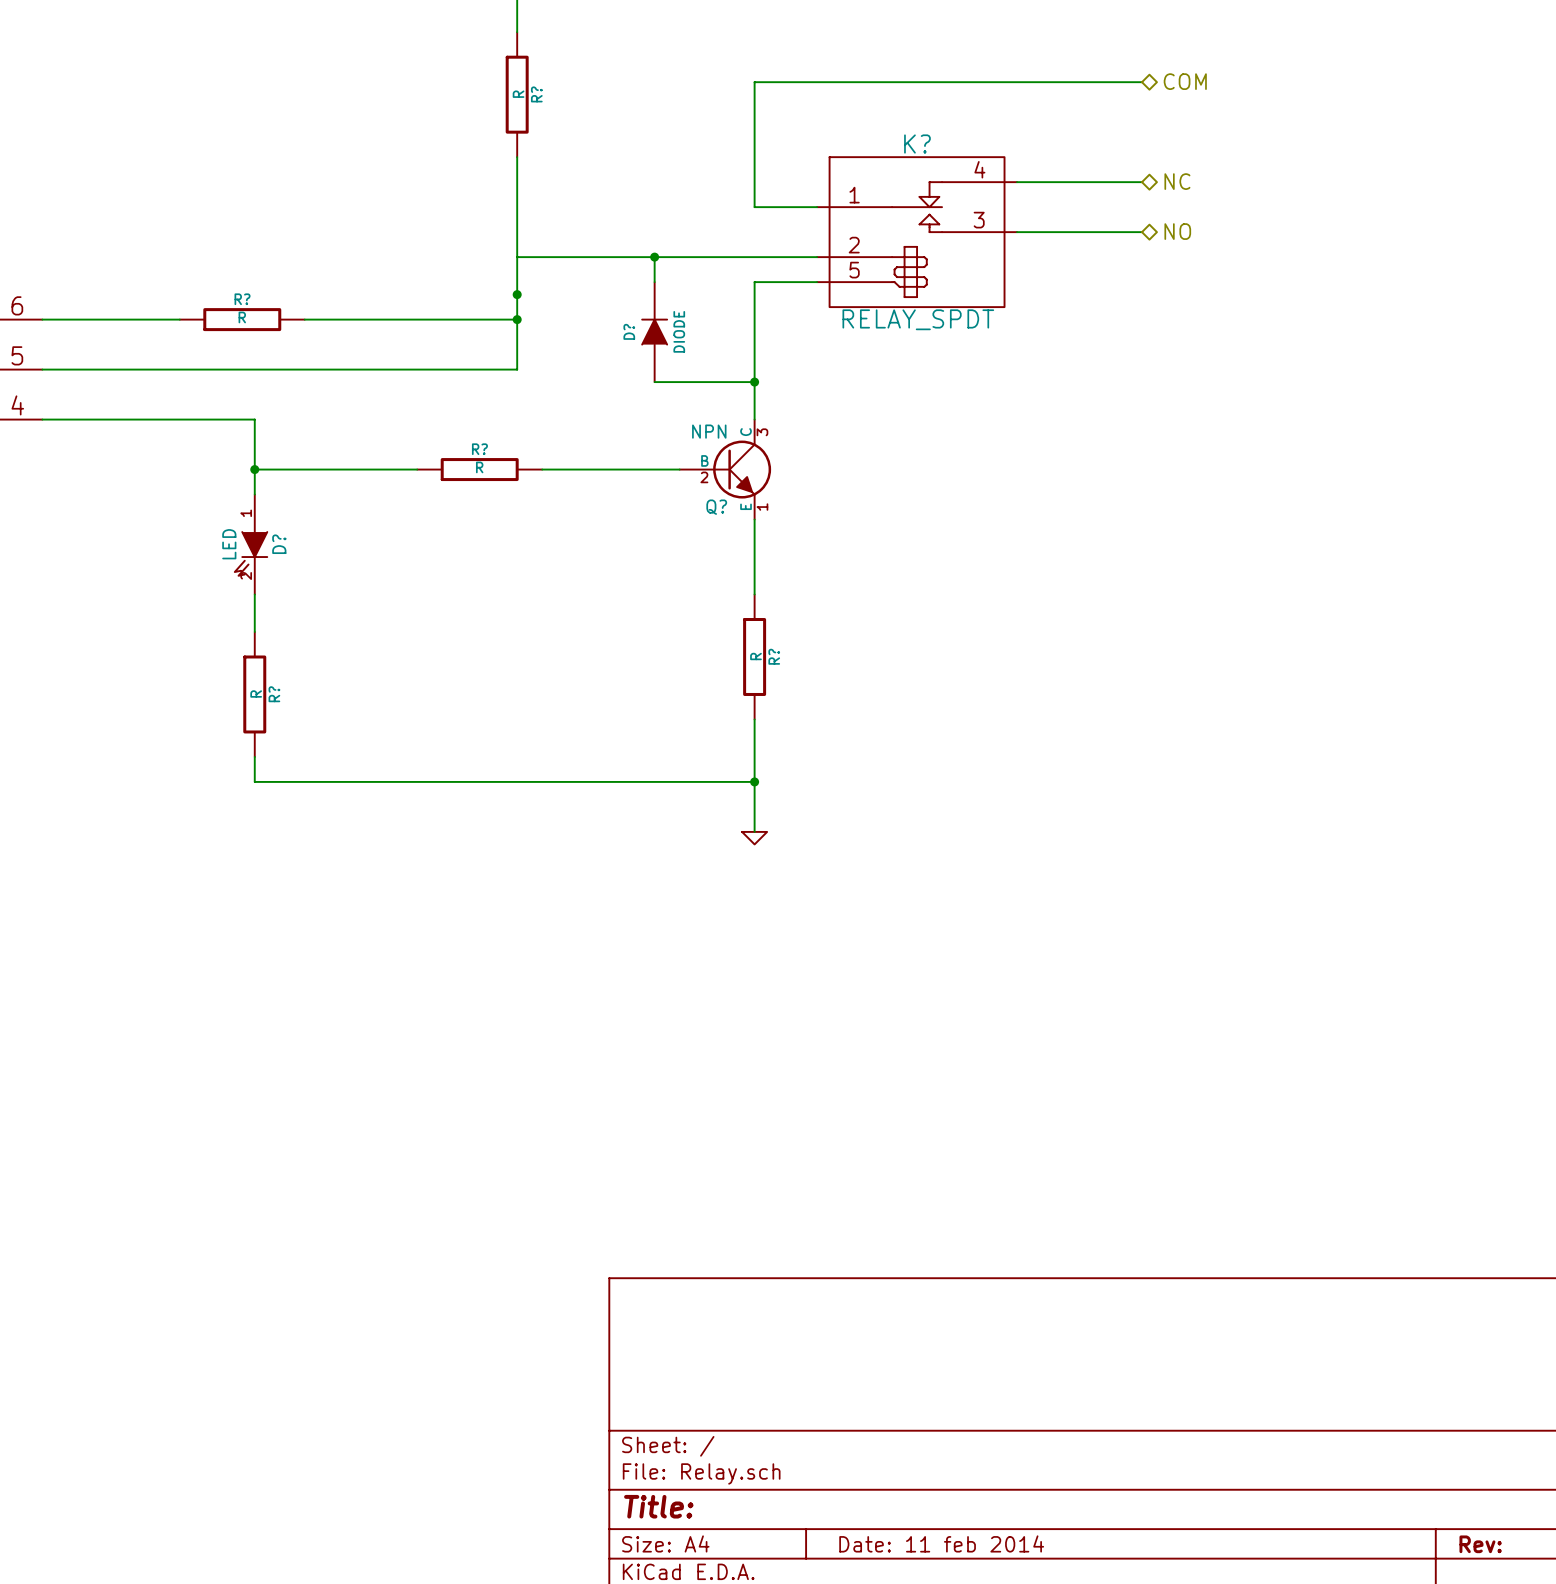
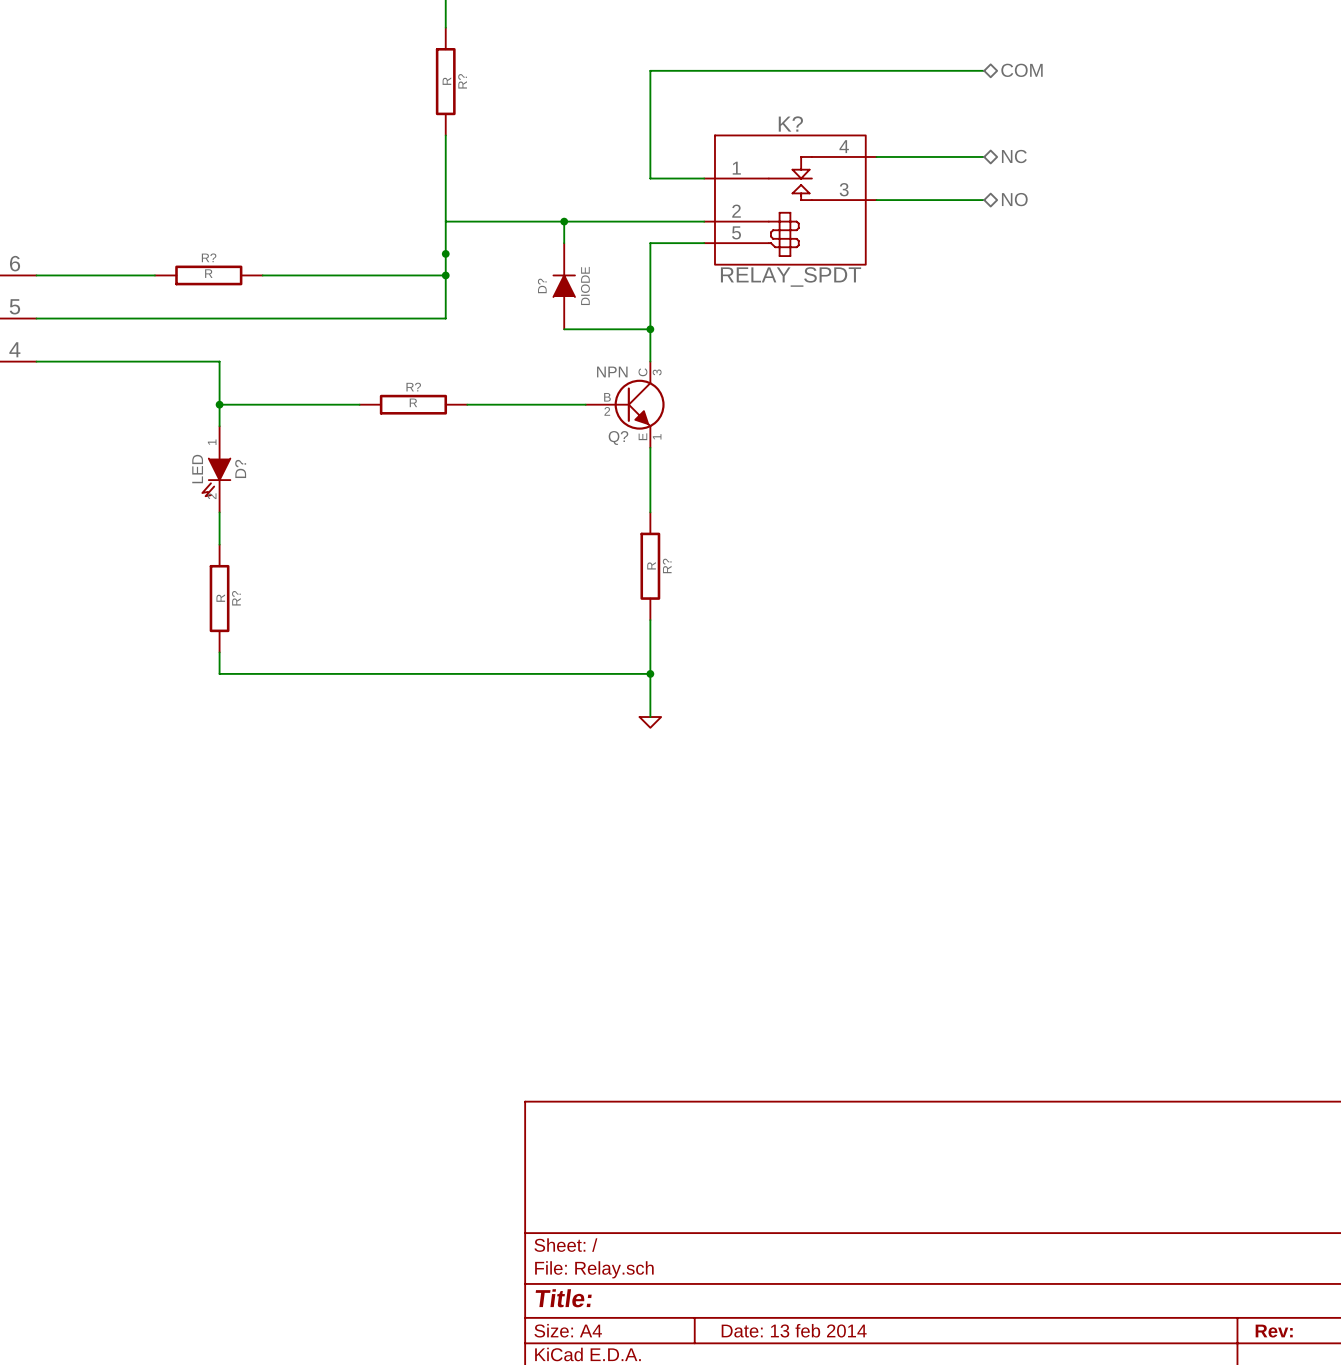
title block: Date: 11 feb 2014 (941, 1543) -> Date: 13 feb 2014 (794, 1330)

